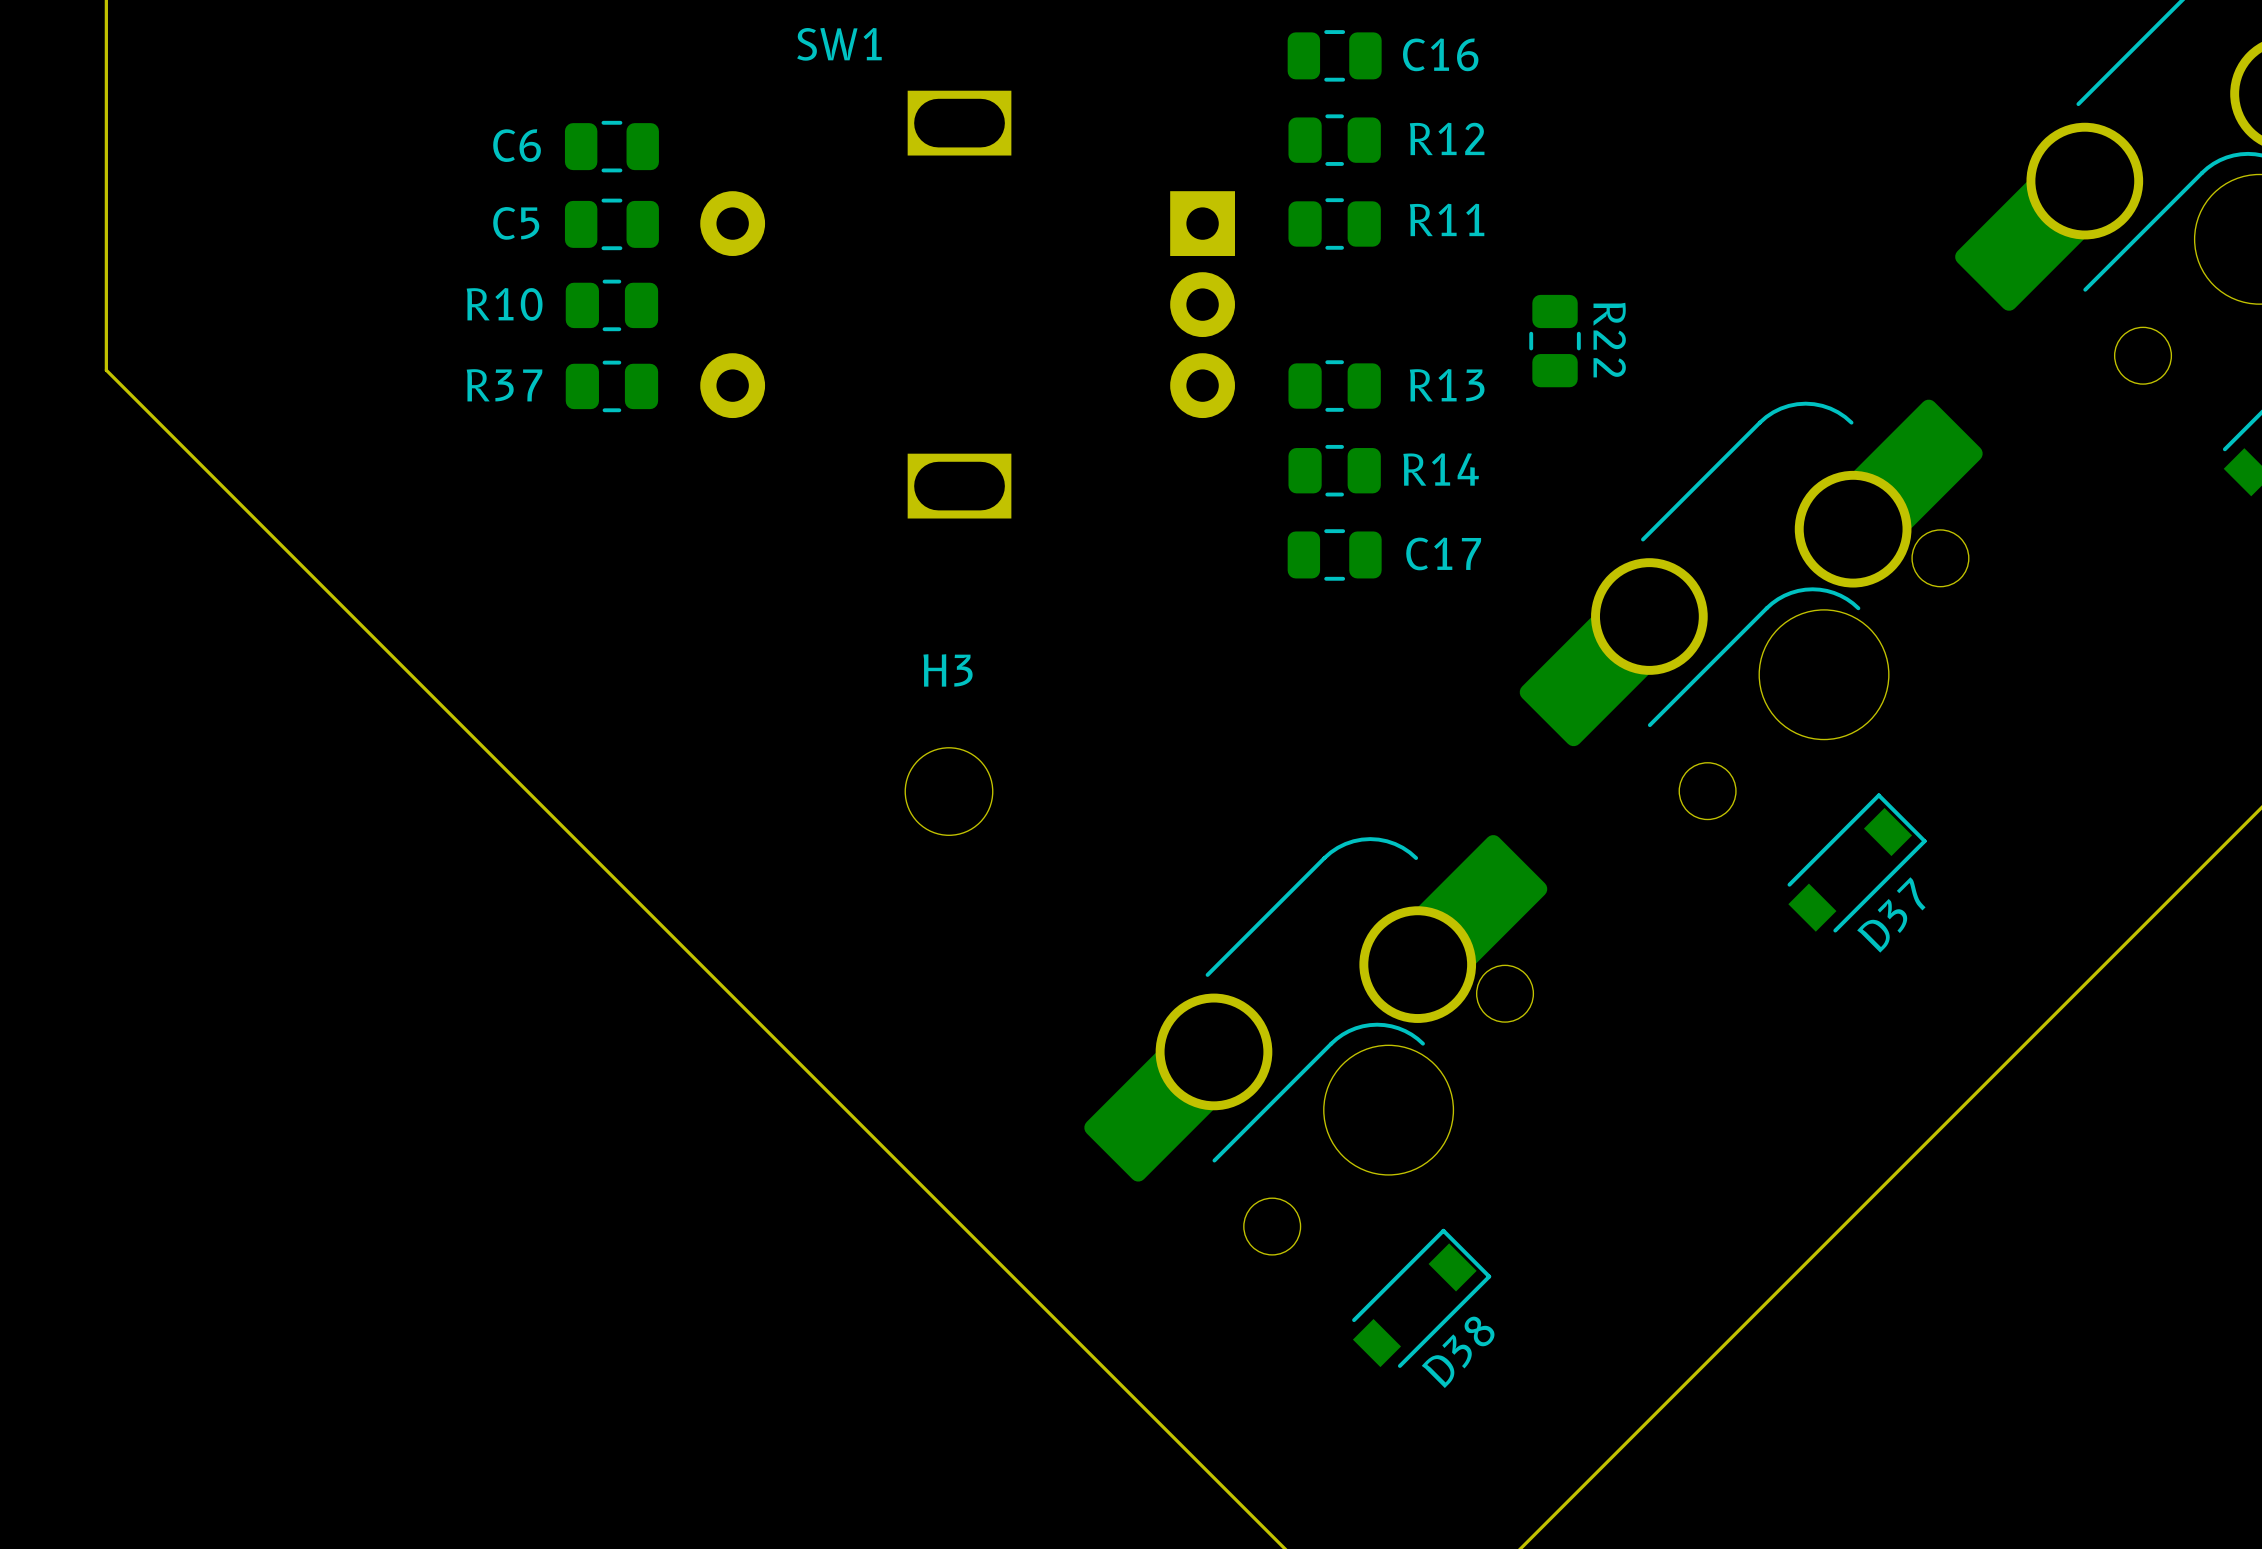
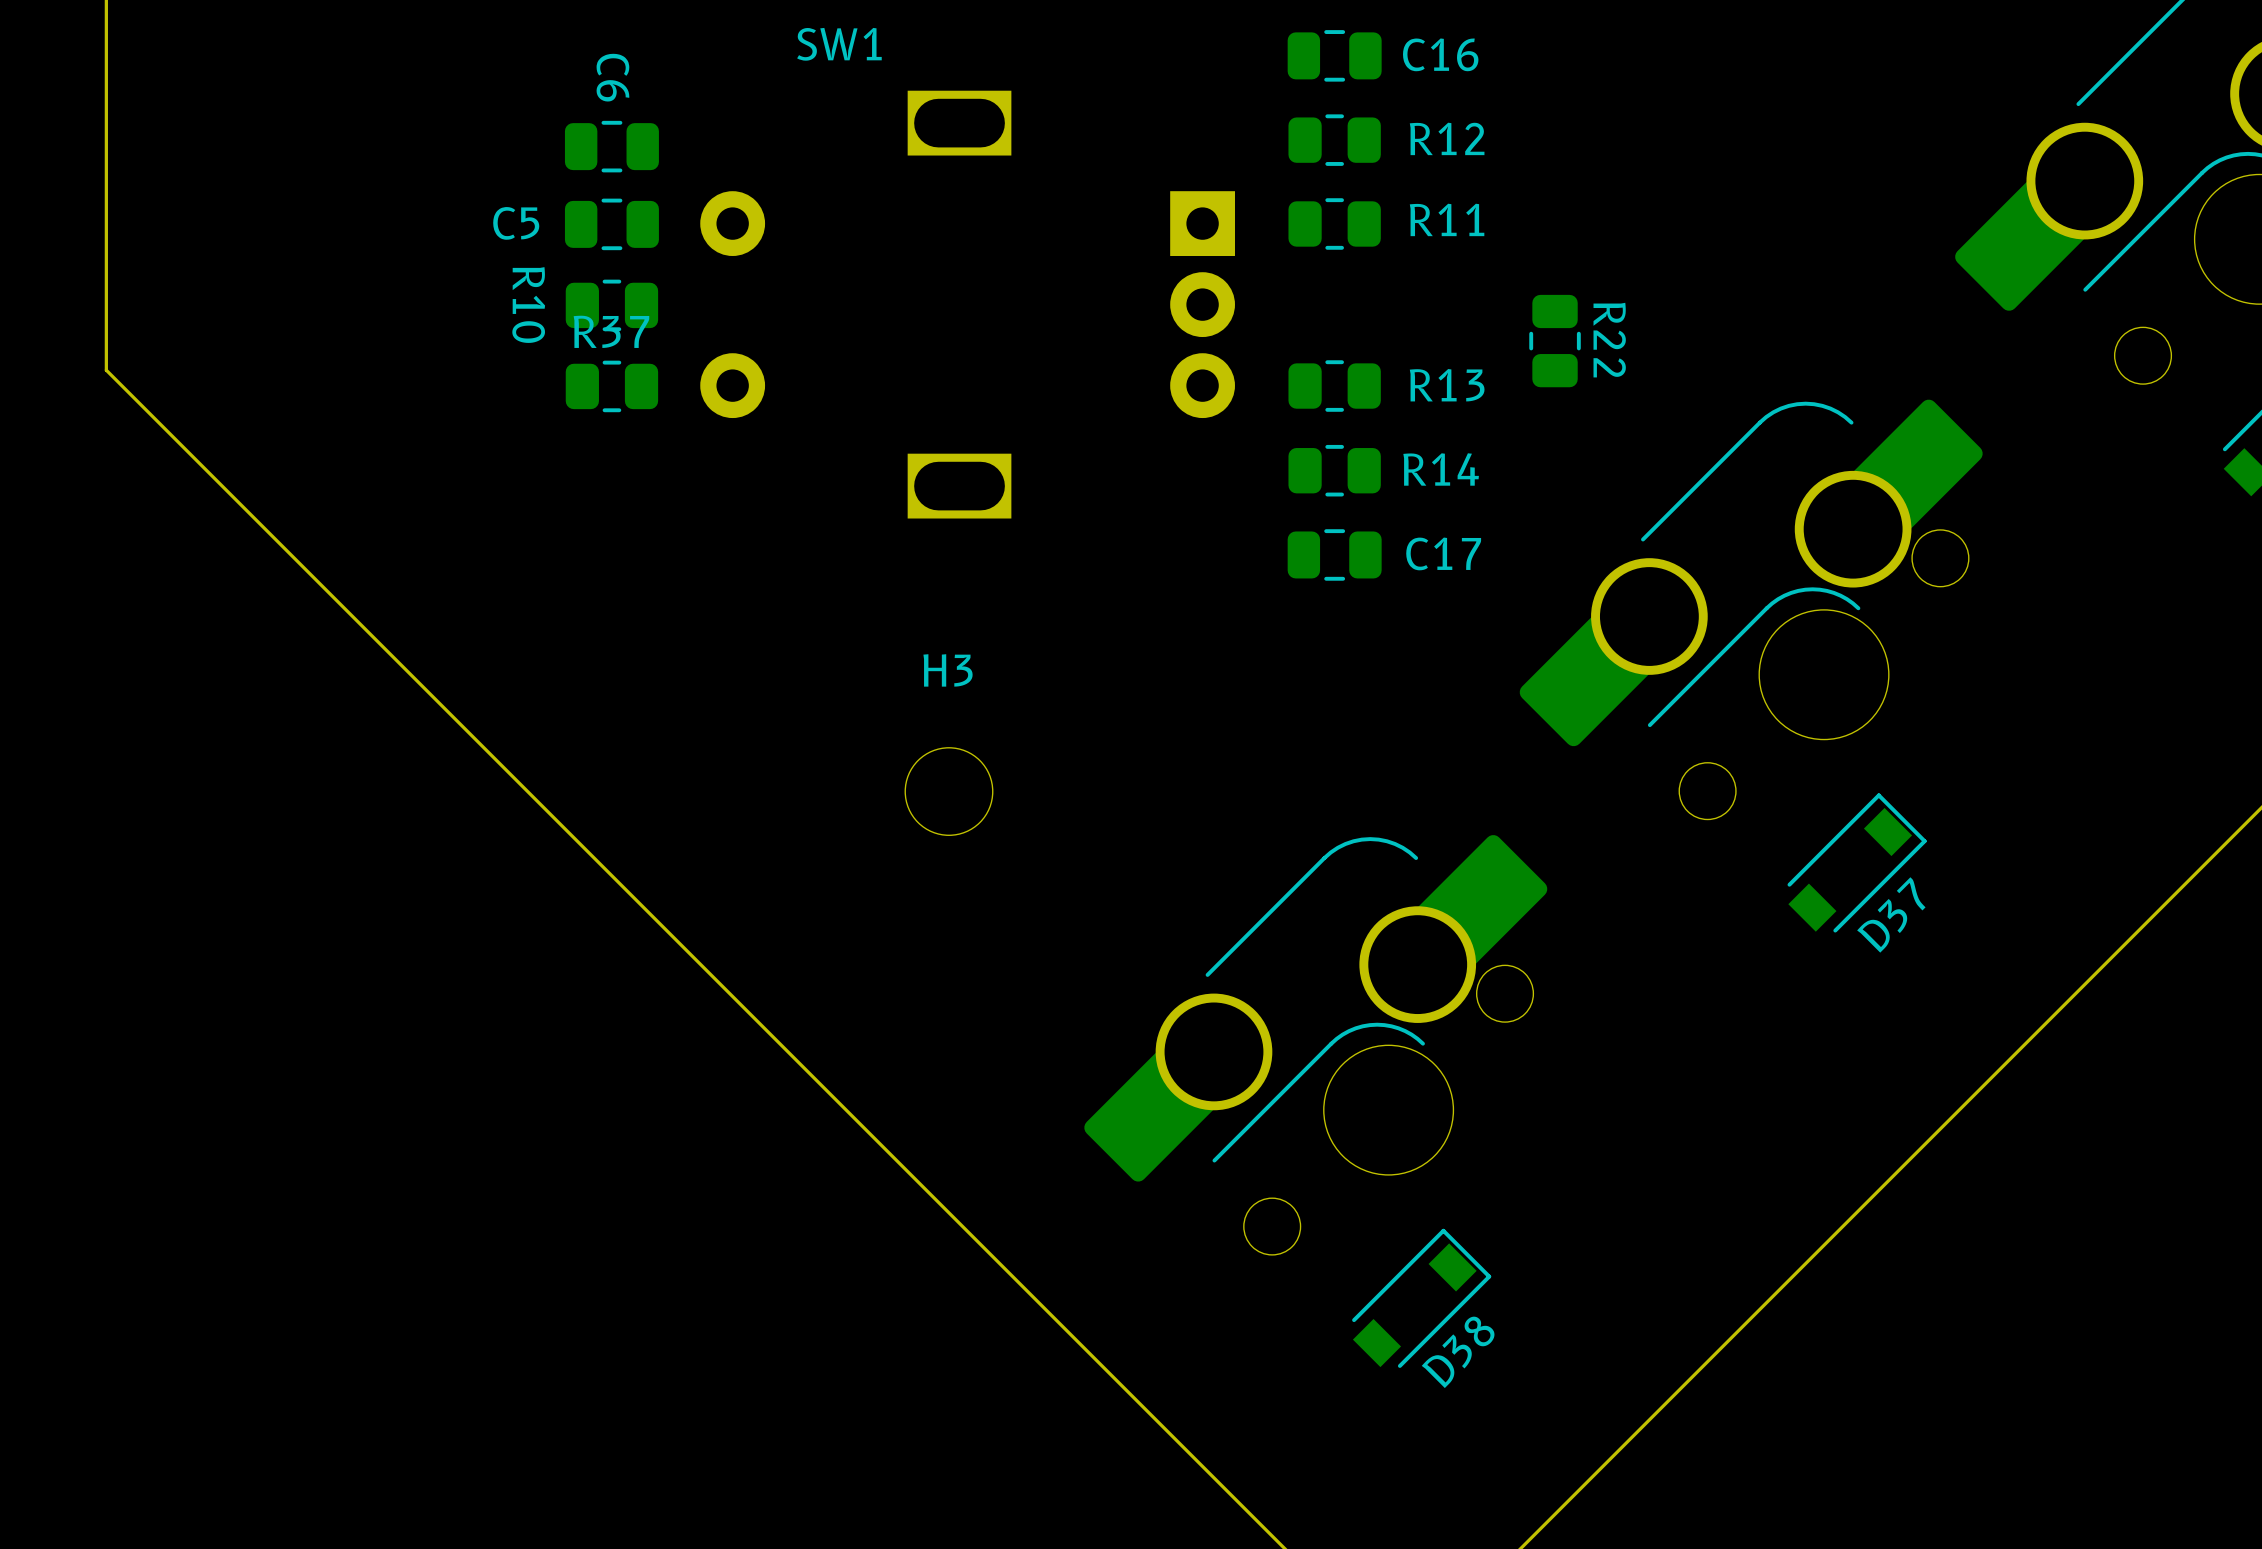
C6 name rotation: 0° (517, 145) -> 90° clockwise (612, 77)
C6 name position: C6 (517, 145) -> C6 (612, 77)
R10 name rotation: 0° (504, 304) -> 90° clockwise (528, 305)
R37 name position: R37 (504, 385) -> R37 (611, 331)

